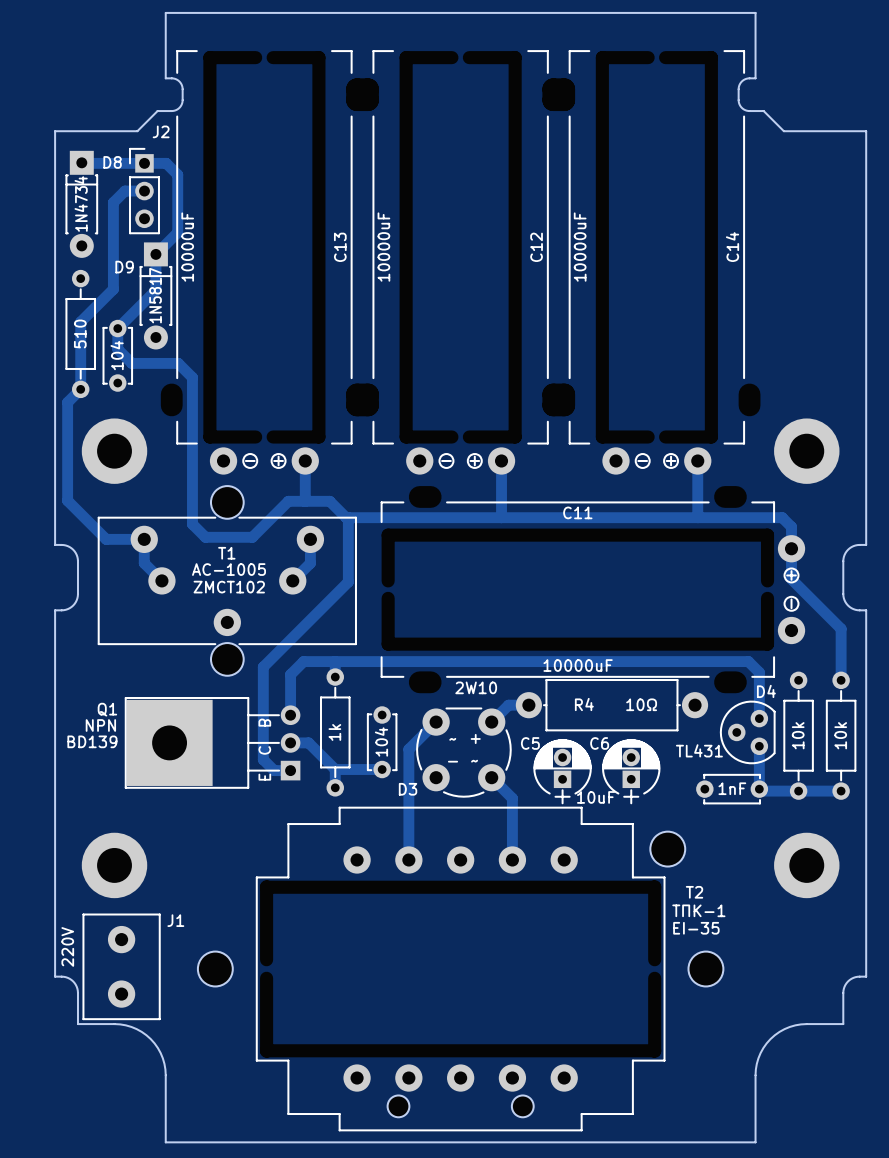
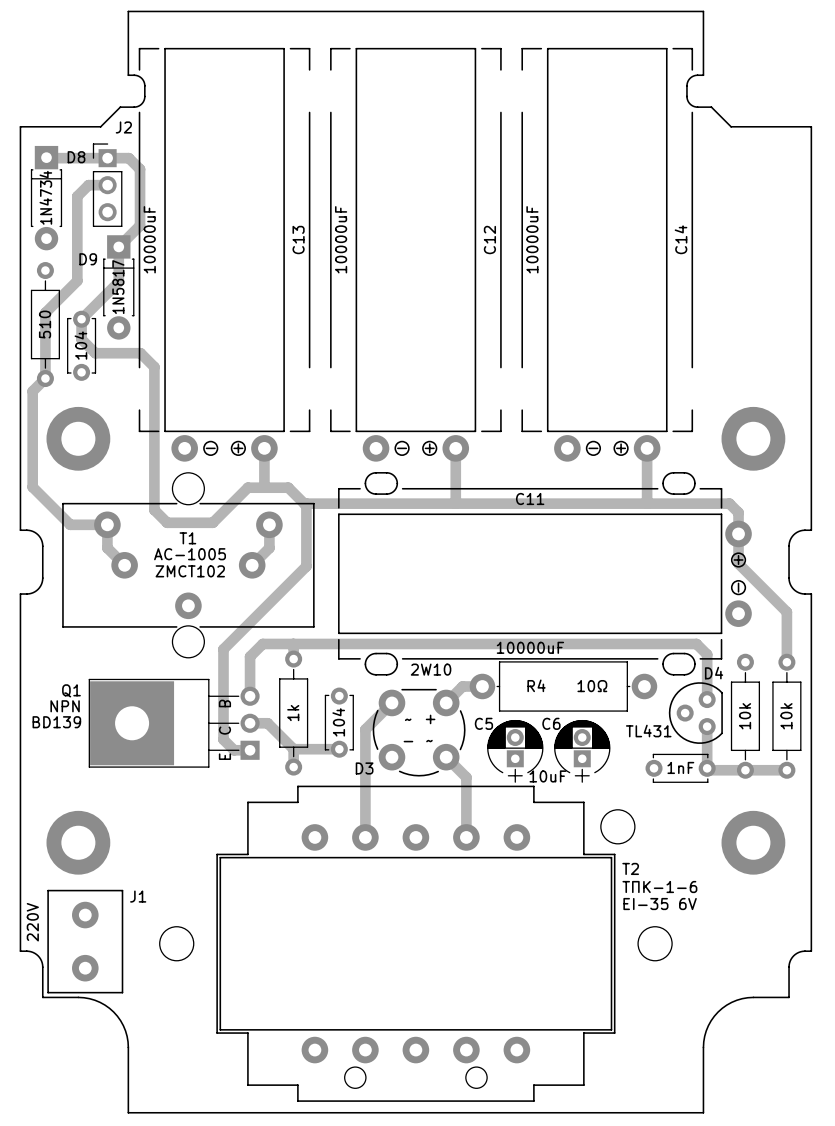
C13 footprint: [176, 50, 353, 475] -> [138, 47, 311, 462]
C12 footprint: [372, 50, 549, 475] -> [330, 47, 502, 462]
C14 footprint: [568, 50, 745, 475] -> [521, 47, 694, 462]
C11 footprint: [380, 486, 806, 694] -> [338, 472, 752, 676]
T2 footprint: [197, 806, 724, 1132] -> [159, 785, 673, 1102]

